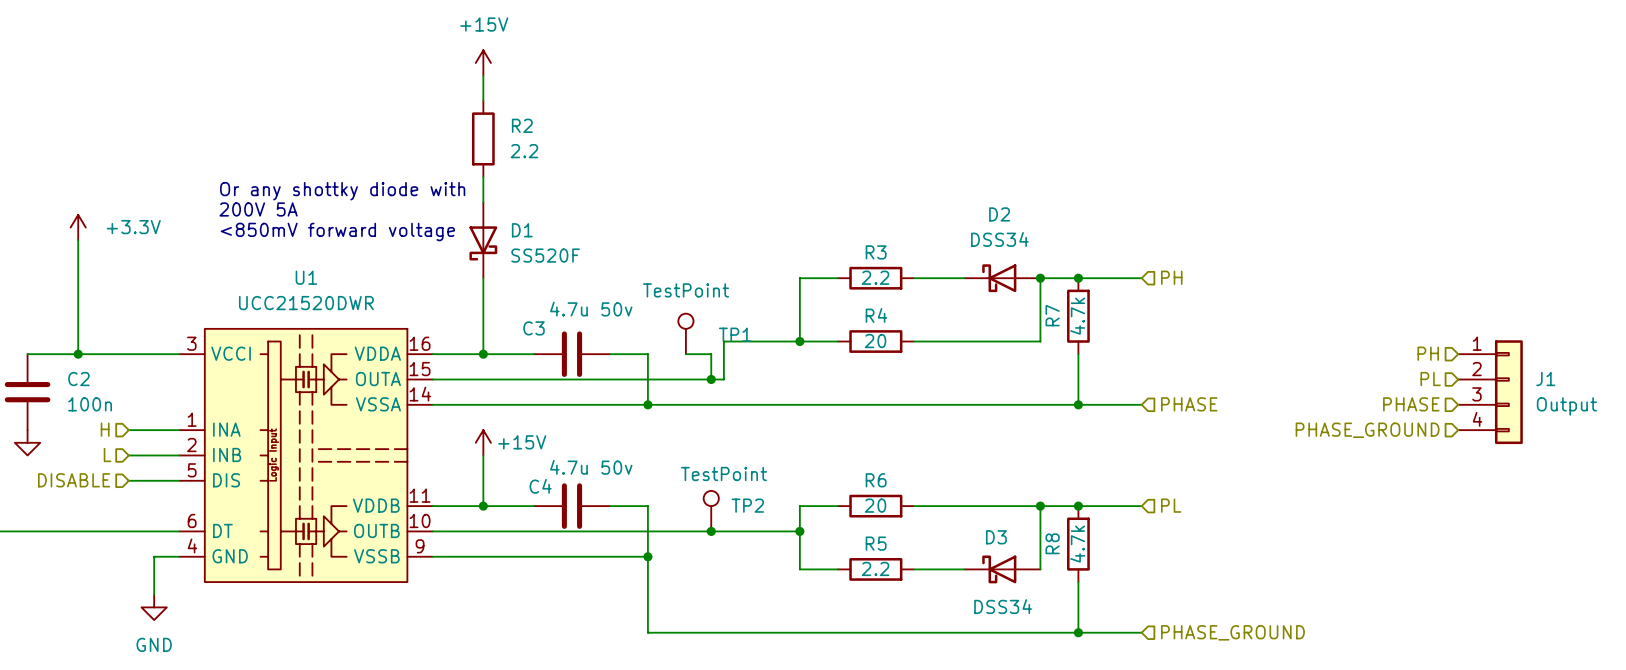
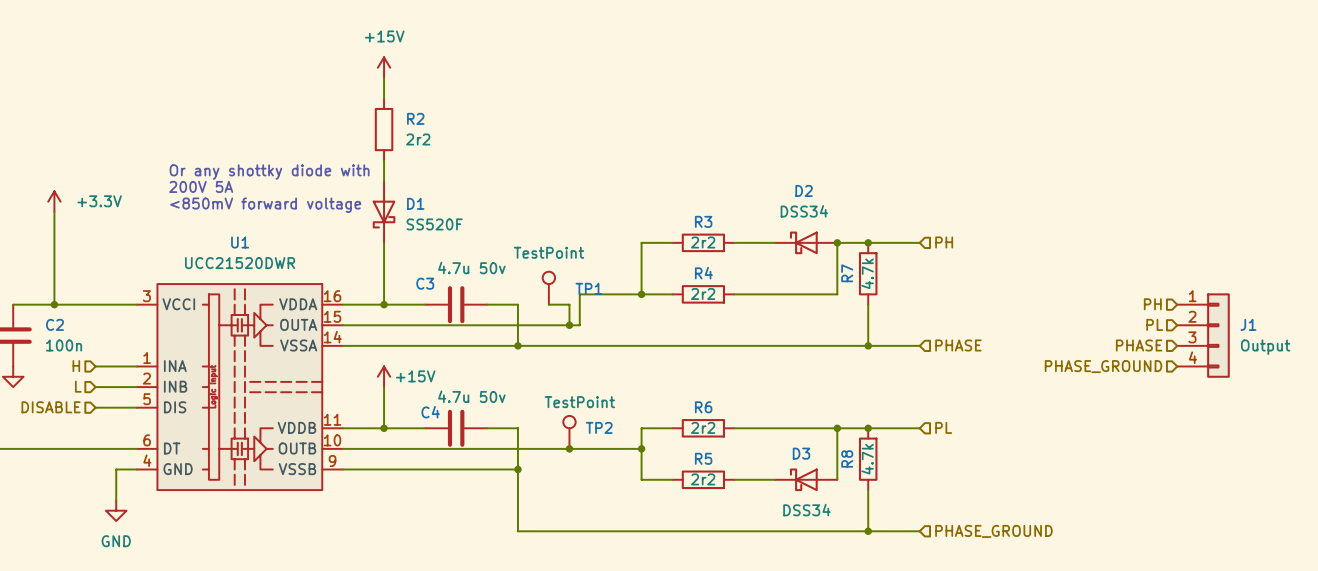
R2 value: 2.2 (524, 151) -> 2r2 (418, 139)
R3 value: 2.2 (875, 277) -> 2r2 (703, 242)
R4 value: 20 (875, 341) -> 2r2 (703, 293)
R6 value: 20 (875, 505) -> 2r2 (703, 427)
R5 value: 2.2 (875, 568) -> 2r2 (703, 479)

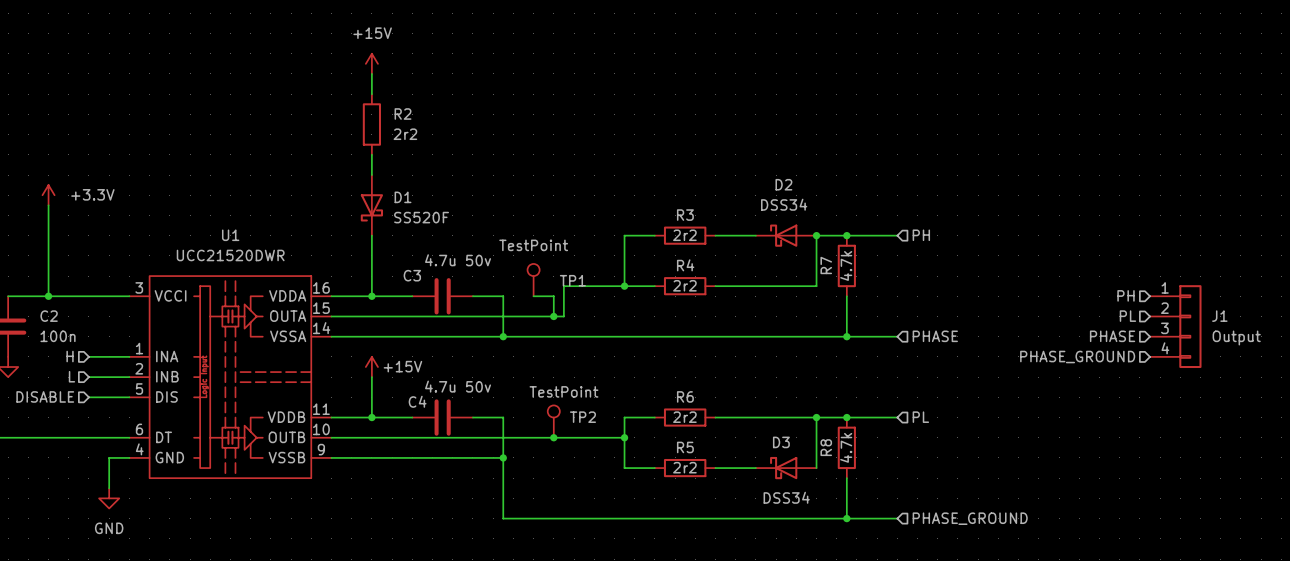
text: Or any shottky diode with (269, 172) -> none
text: 200V 5A (201, 186) -> none
text: <850mV forward voltage (265, 205) -> none

